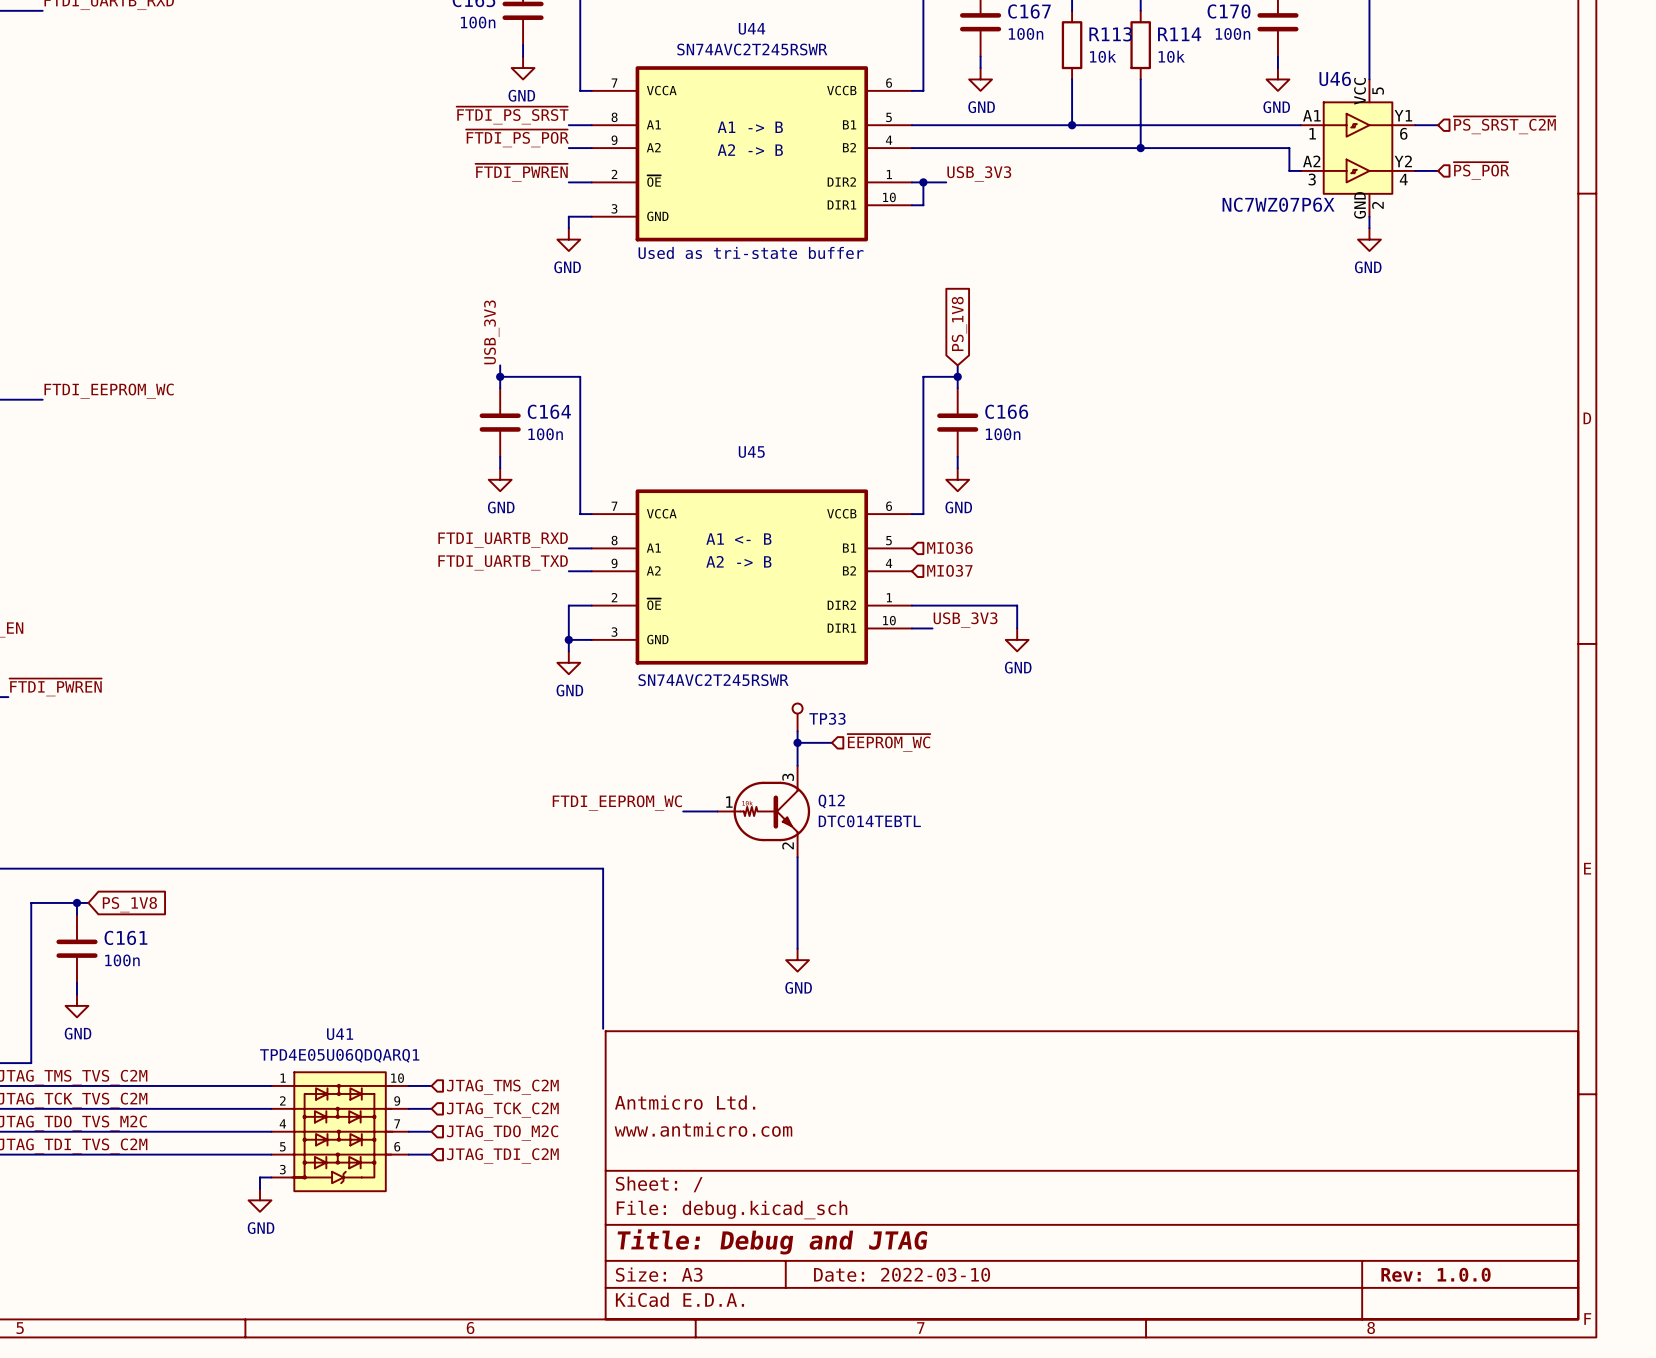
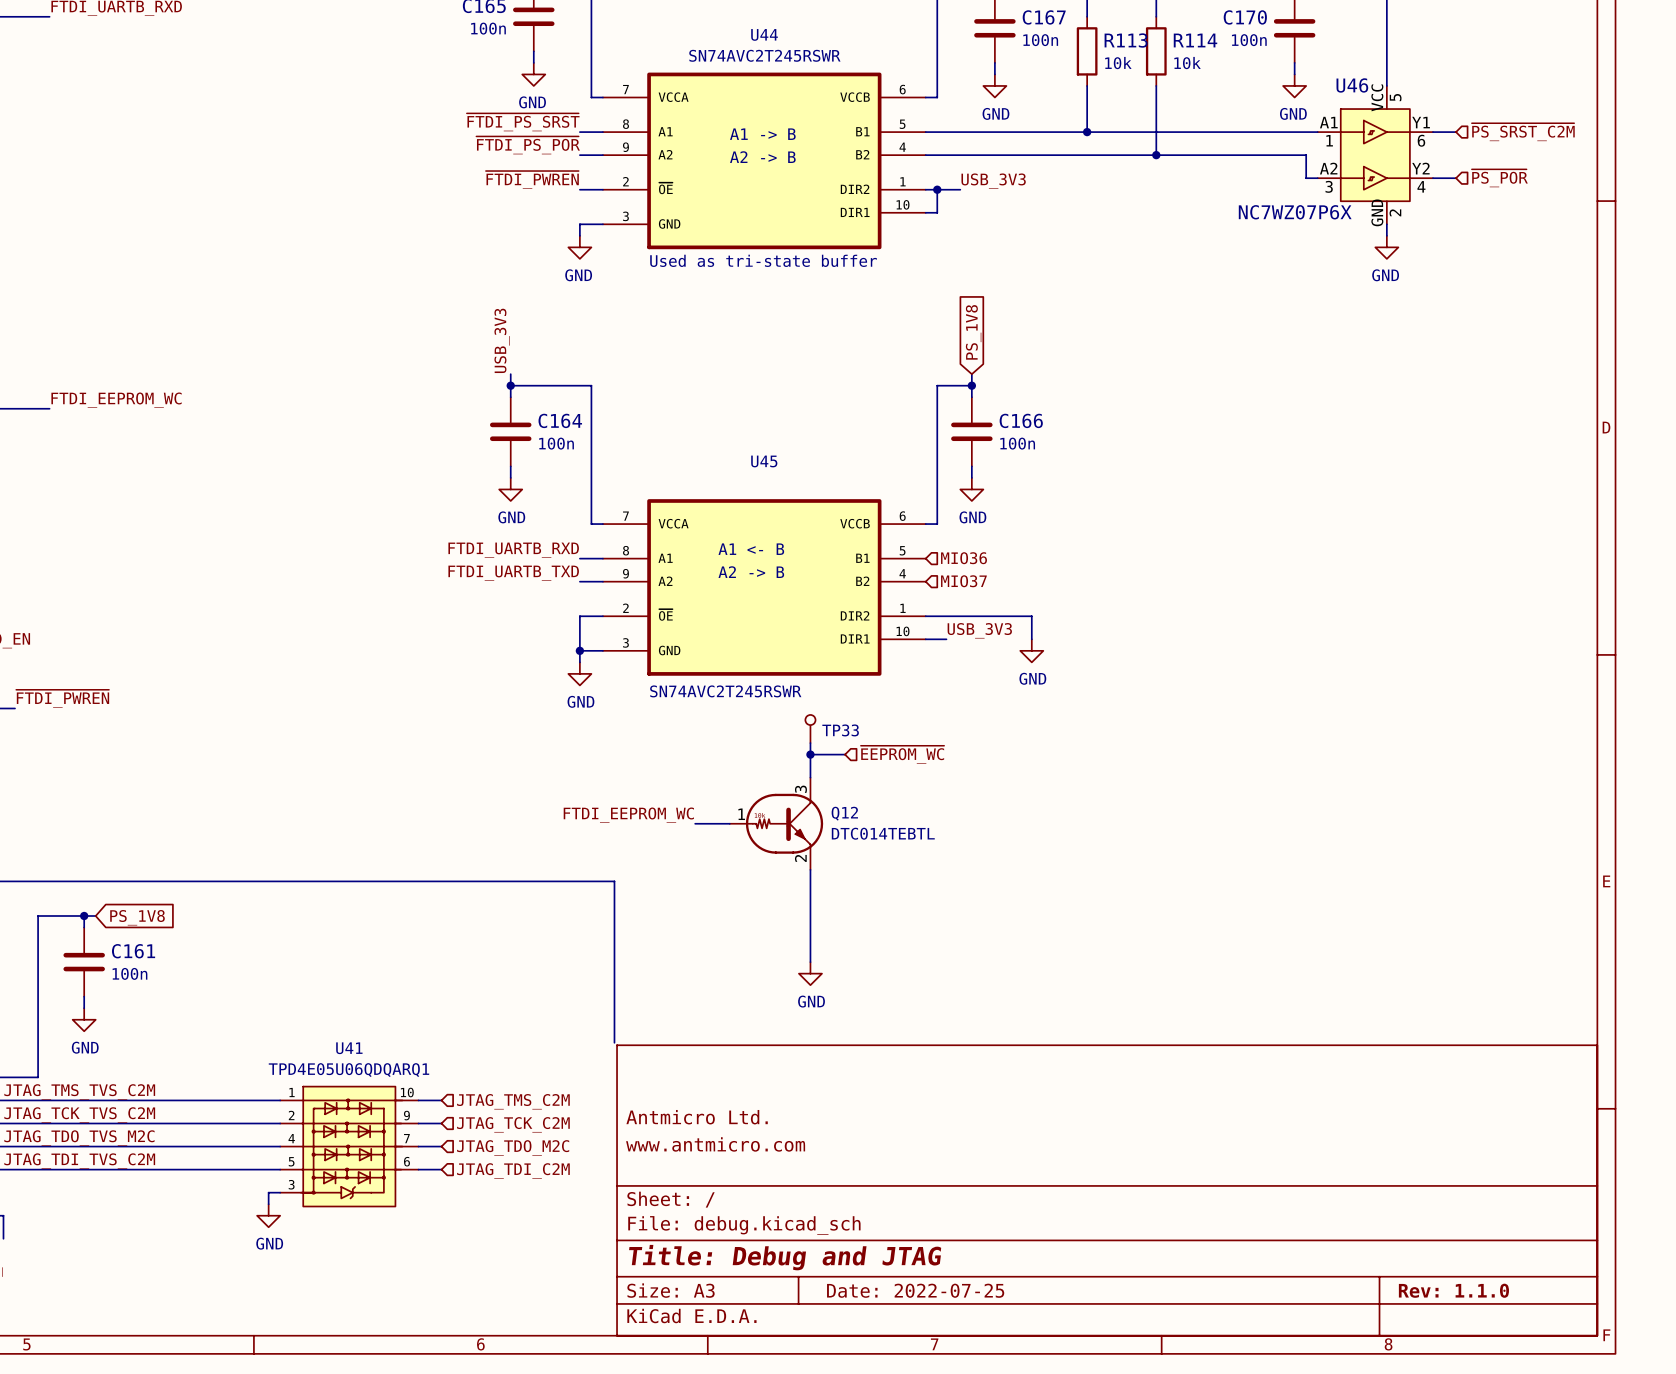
title block: Date: 2022-03-10 (902, 1274) -> Date: 2022-07-25 (915, 1290)
title block: Rev: 1.0.0 (1436, 1274) -> Rev: 1.1.0 (1453, 1290)

